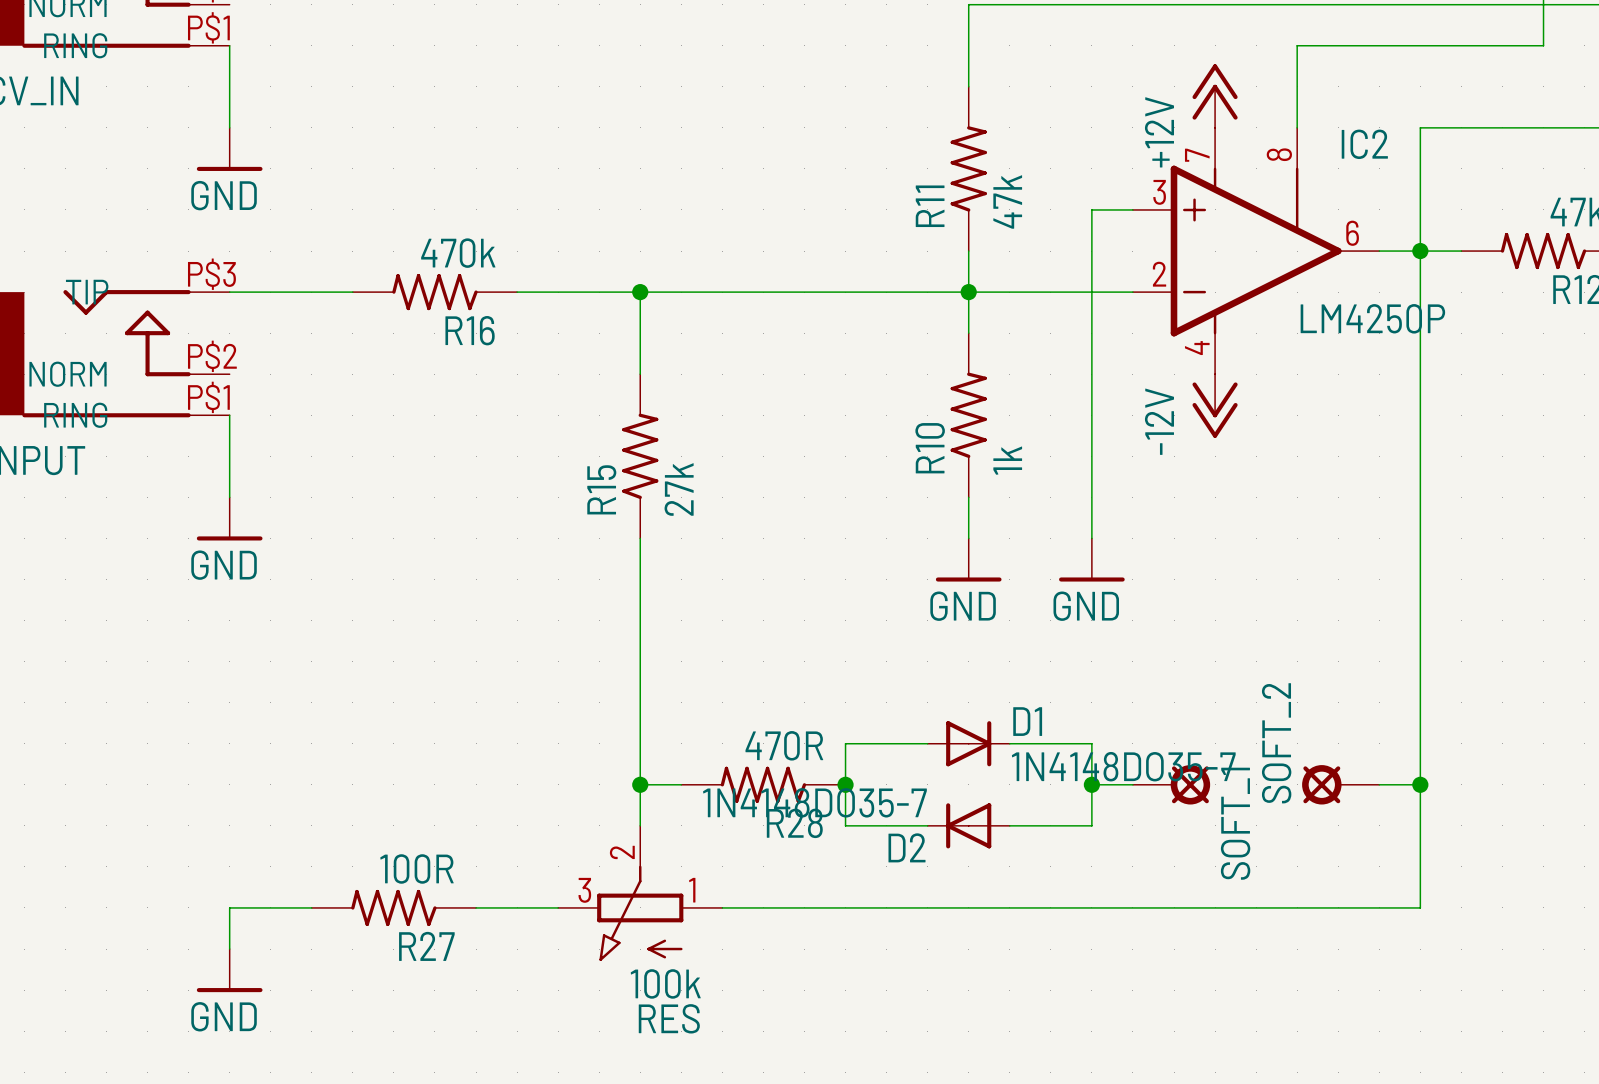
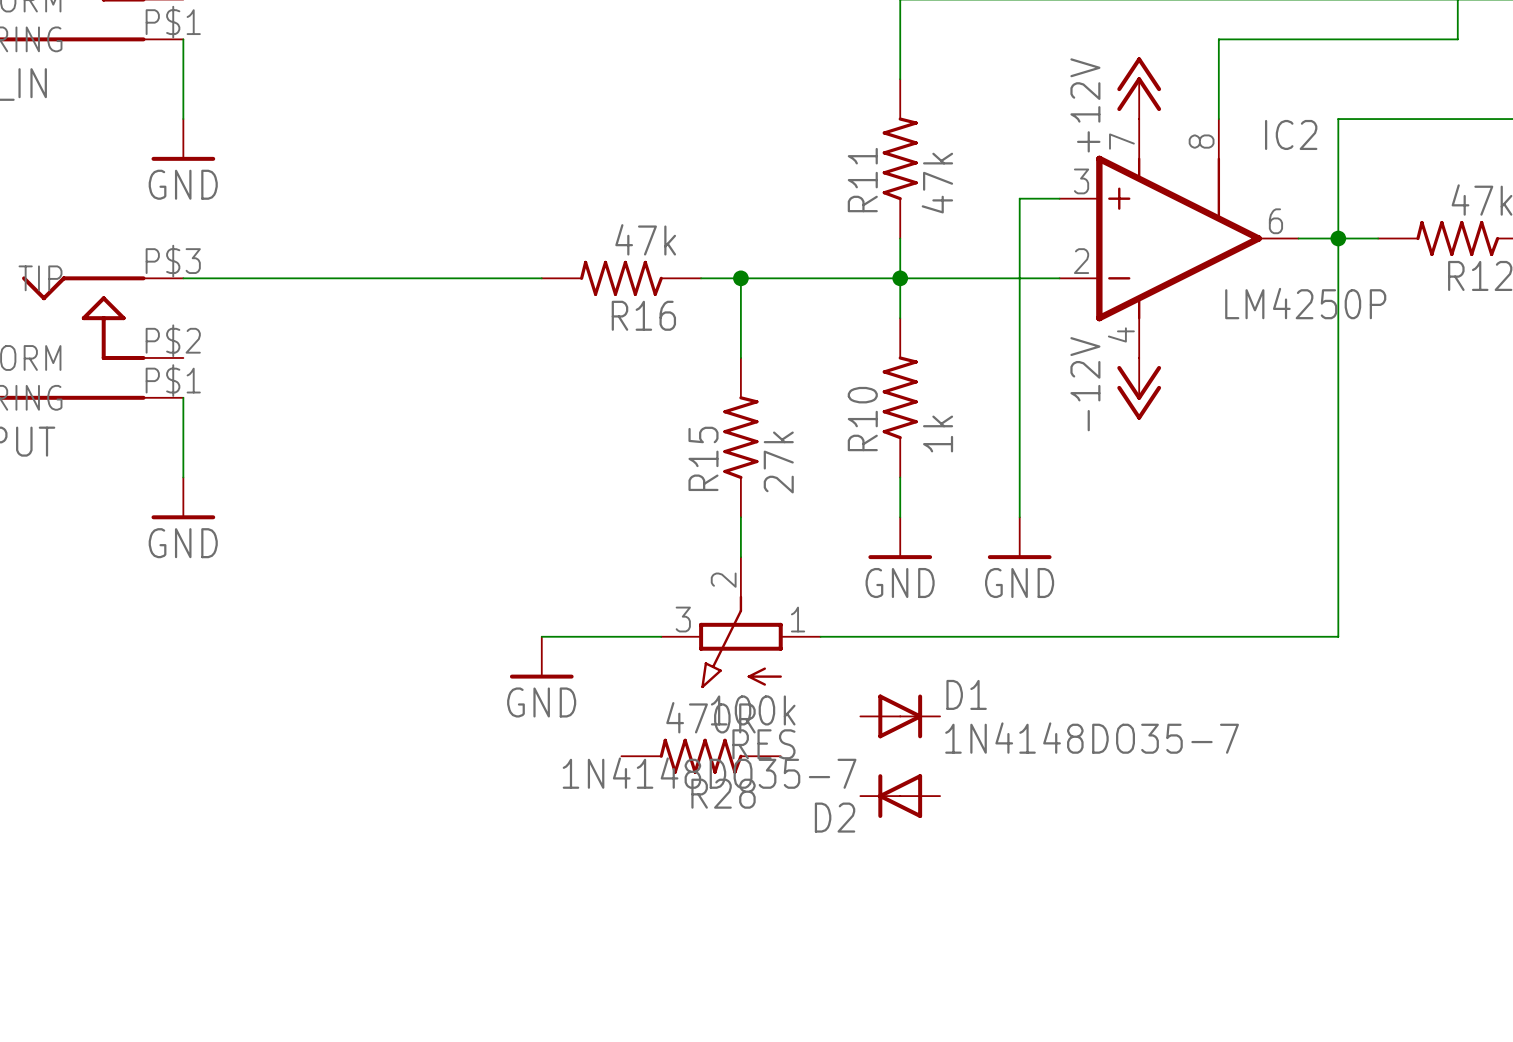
R16 value: 470k (458, 253) -> 47k (645, 239)
R16 position: (434, 292) -> (621, 278)
wire: (640, 292) (640, 374) -> (740, 278) (740, 357)
junction: (640, 292) -> none
junction: none -> (740, 278)
R15 position: (640, 456) -> (740, 437)
wire: (640, 538) (640, 825) -> none
wire: none -> (740, 517) (740, 557)
wire: none -> (541, 636) (661, 636)
wire: (1420, 661) (1420, 907) (722, 907) -> (1338, 636) (820, 636)
power symbol: none -> GND (541, 657)
wire: (927, 743) (845, 743) (845, 825) (927, 825) -> none
wire: (1009, 743) (1091, 743) (1091, 825) (1009, 825) -> none
wire: (640, 784) (681, 784) -> none
junction: (640, 784) -> none
junction: (845, 784) -> none
wire: (1091, 784) (1132, 784) -> none
junction: (1091, 784) -> none
SOFT_1: (1171, 784) -> none
SOFT_2: (1340, 784) -> none
wire: (1379, 784) (1420, 784) -> none
junction: (1420, 784) -> none
RES position: (640, 893) -> (740, 622)
wire: (311, 907) (229, 907) (229, 949) -> none
R27: 100R (393, 907) -> none
wire: (476, 907) (558, 907) -> none
power symbol: GND (229, 970) -> none

